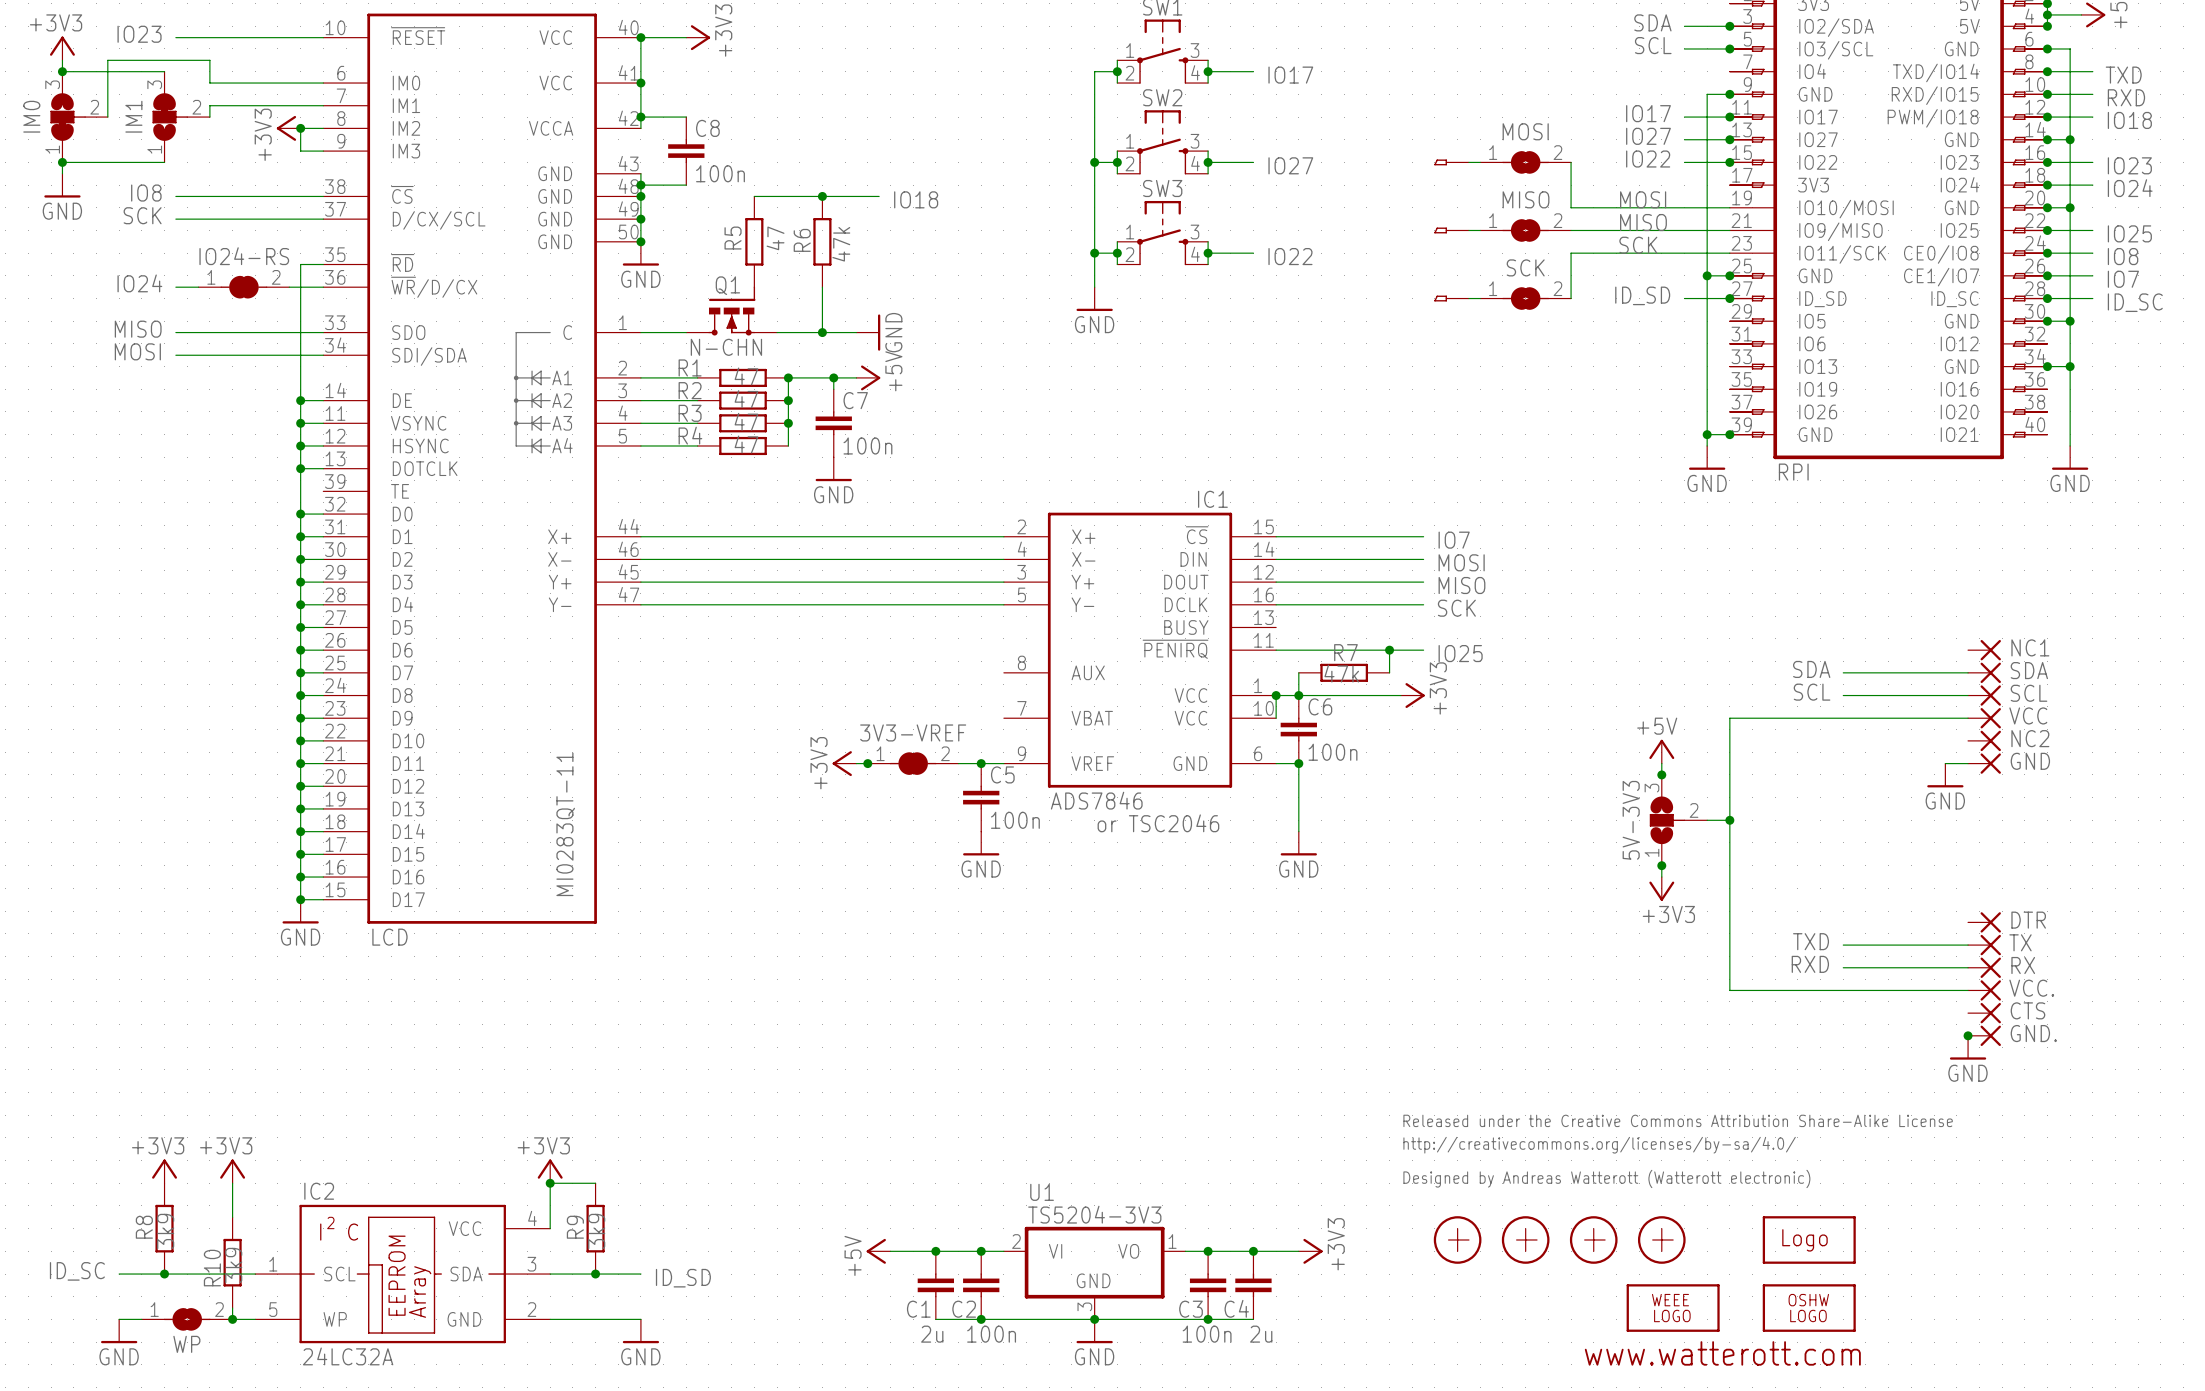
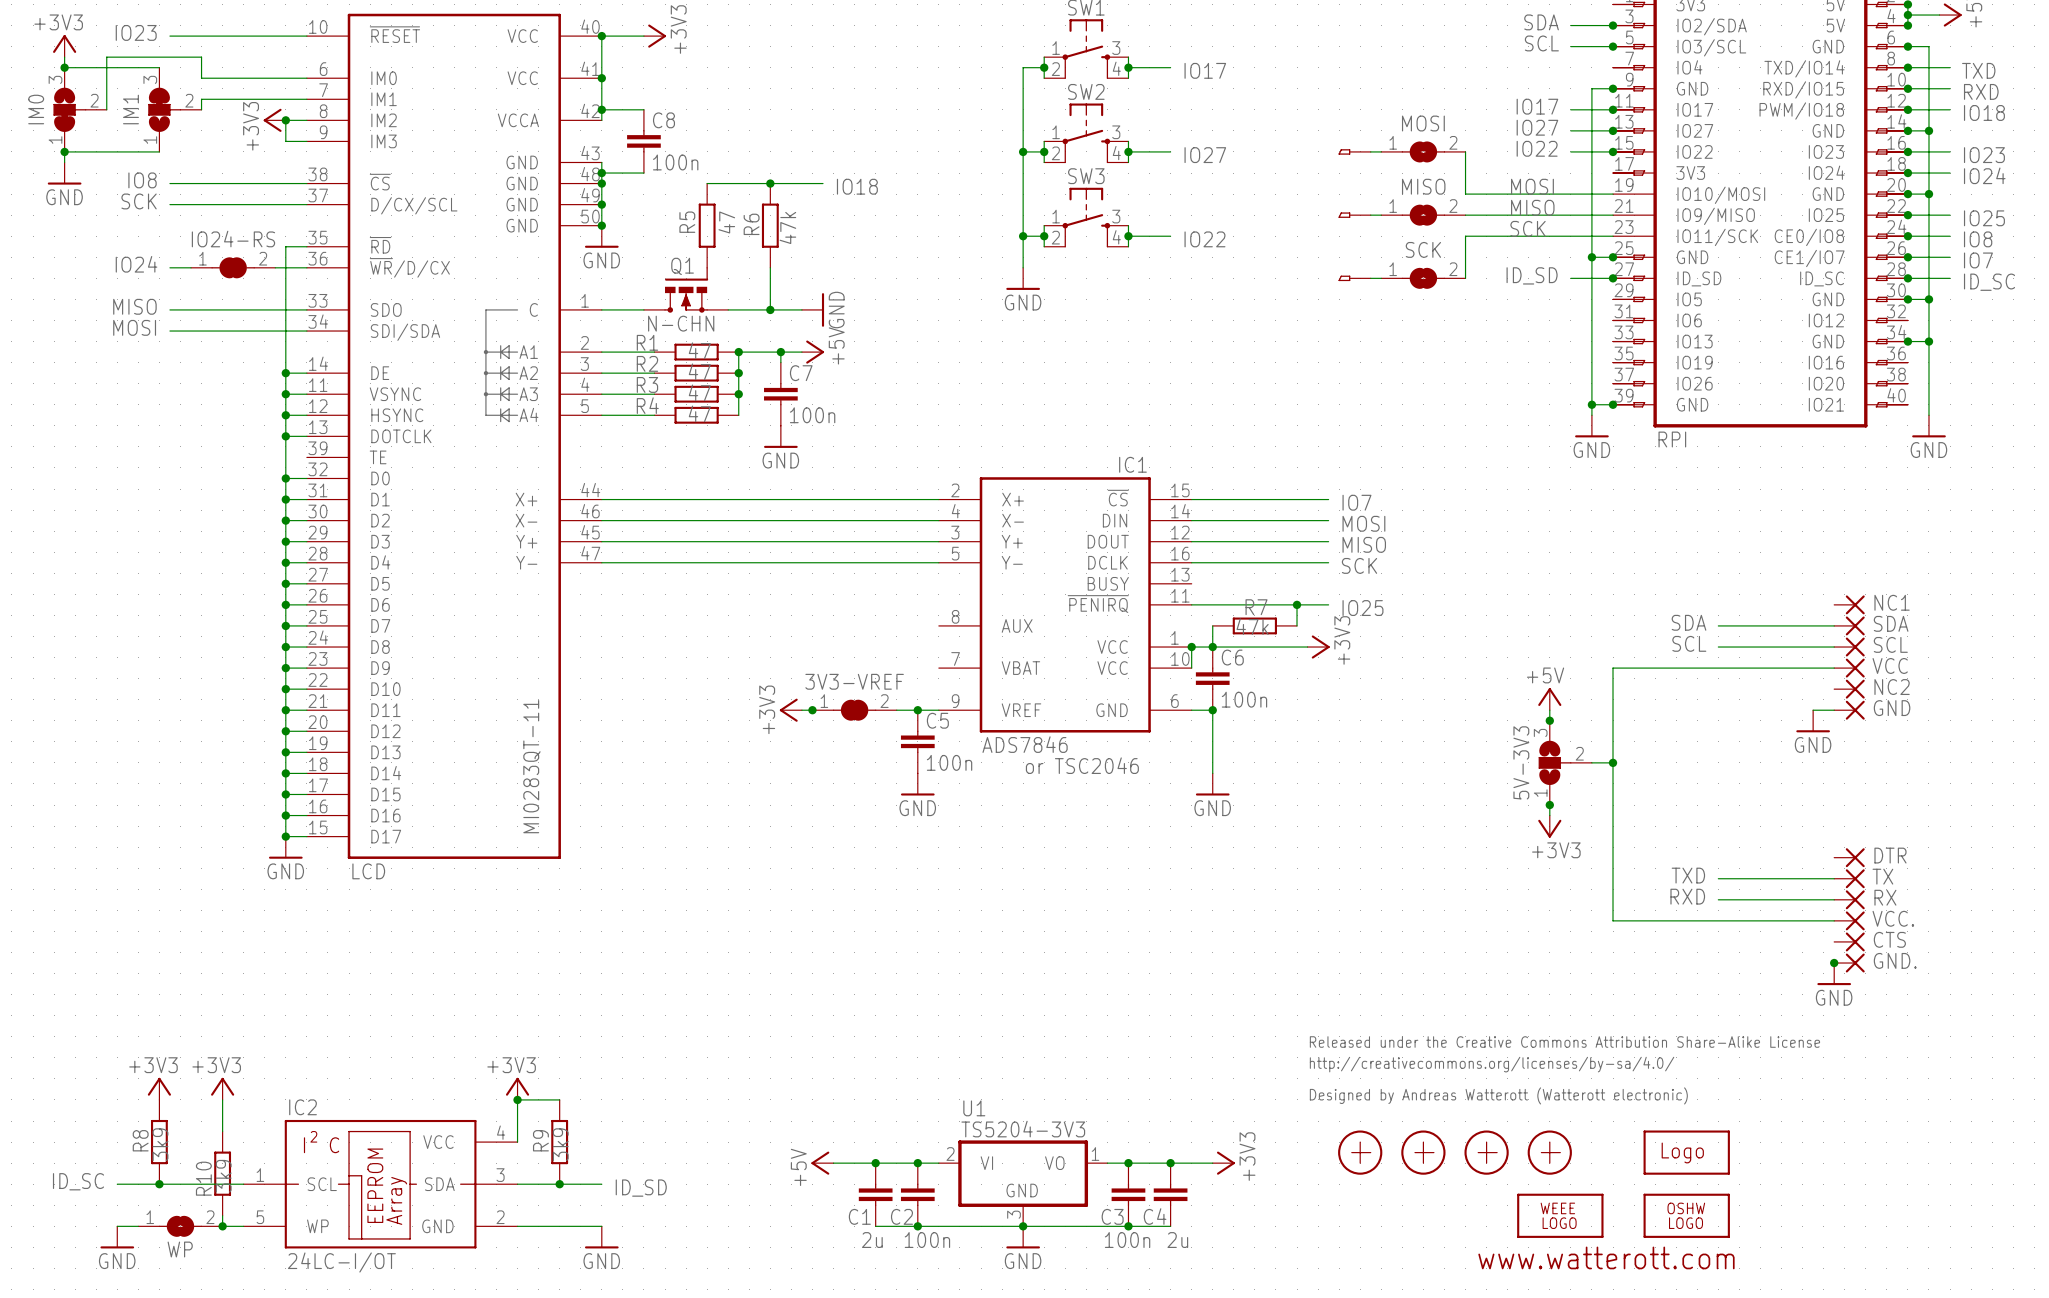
IC2 value: 24LC32A (348, 1356) -> 24LC-I/OT (341, 1262)

